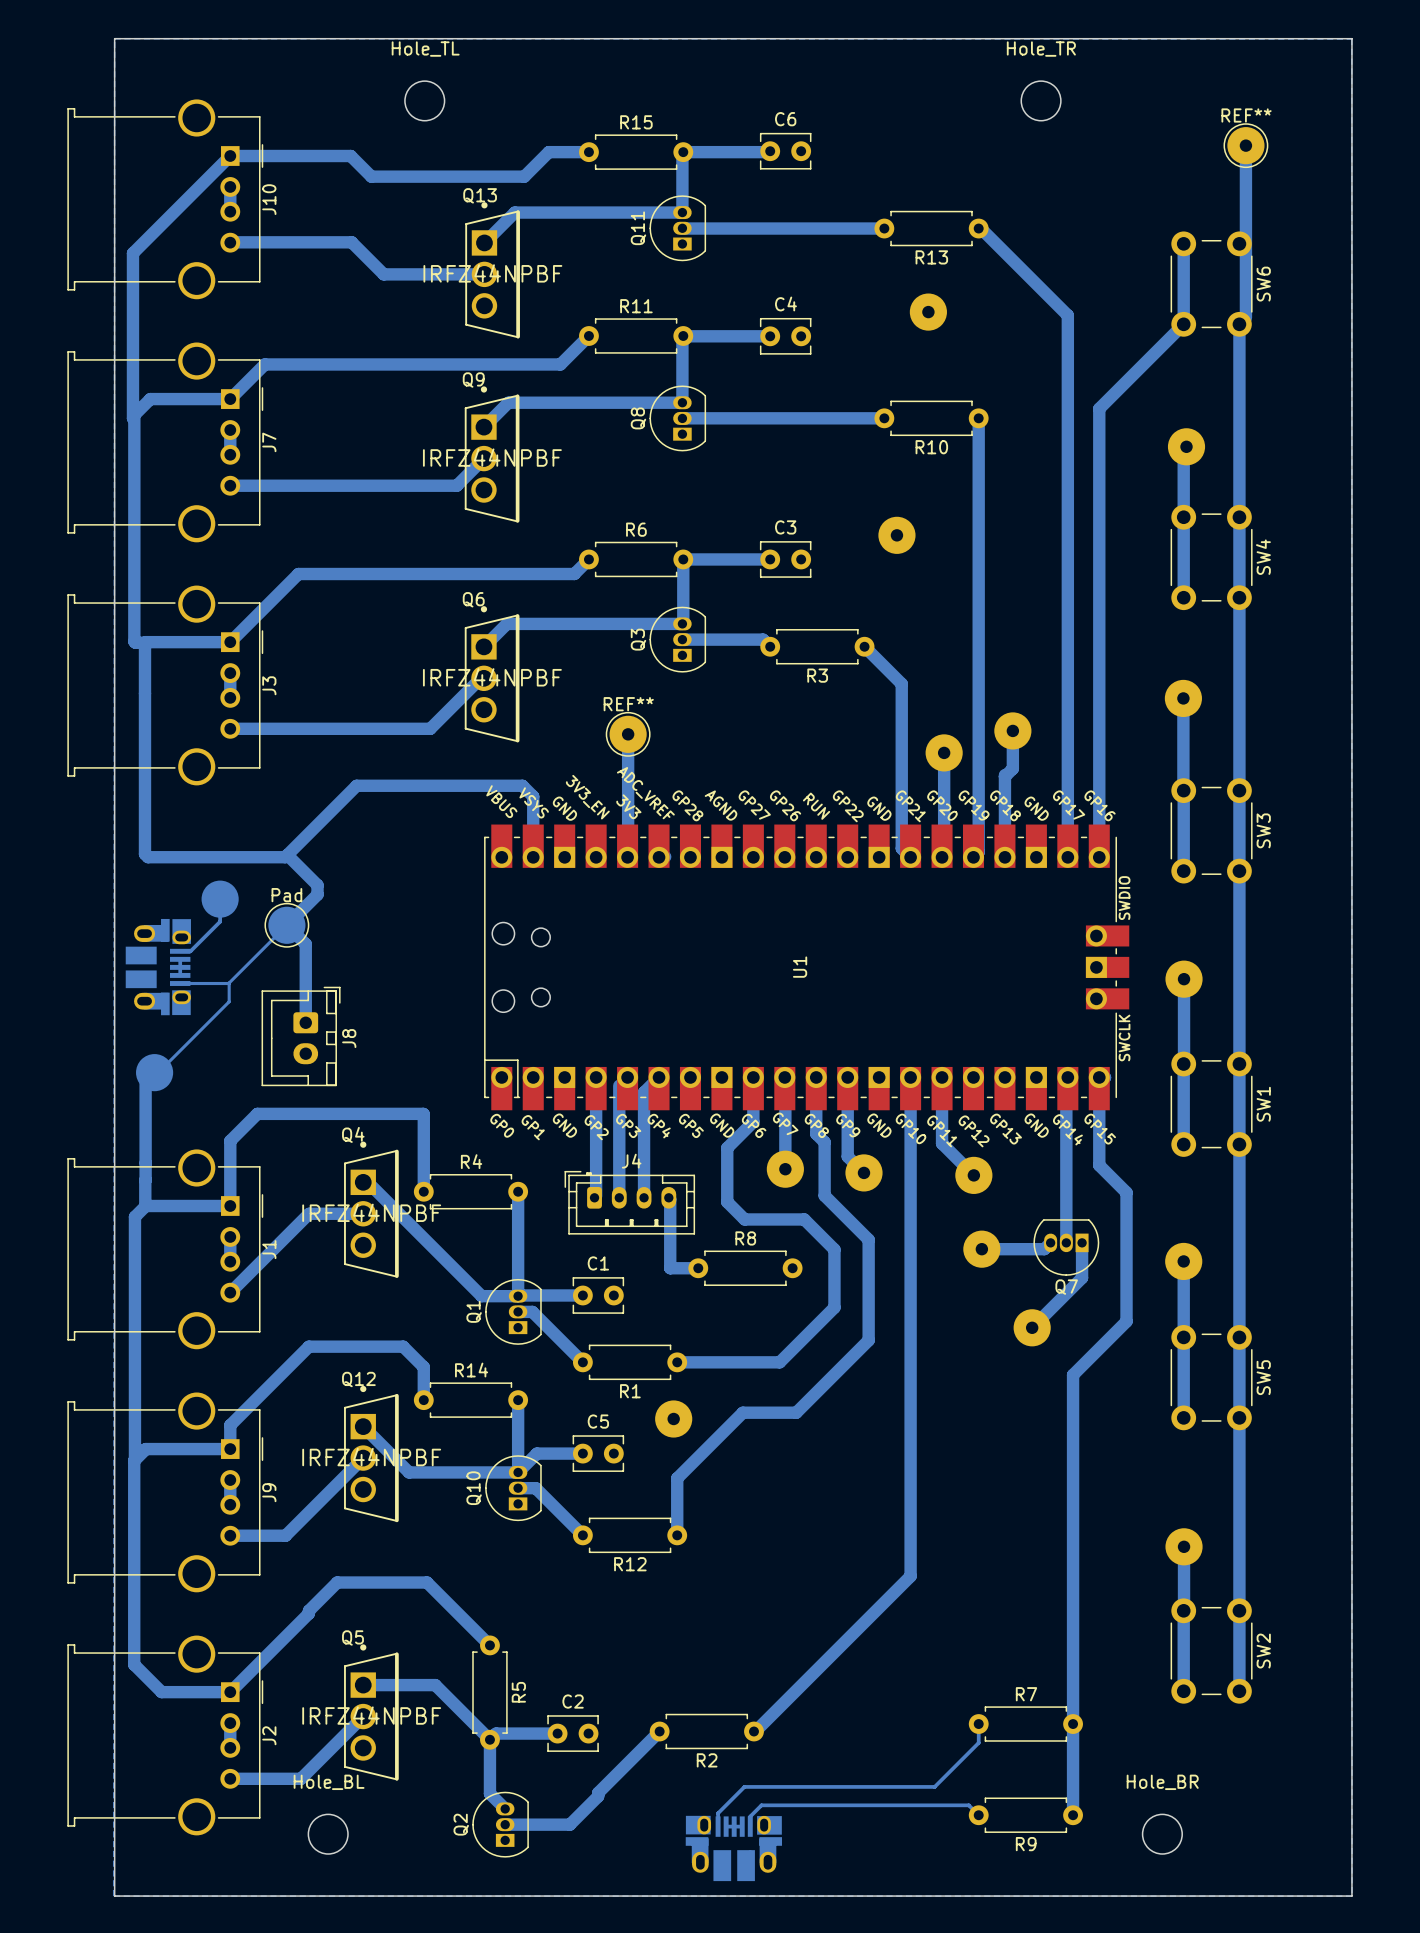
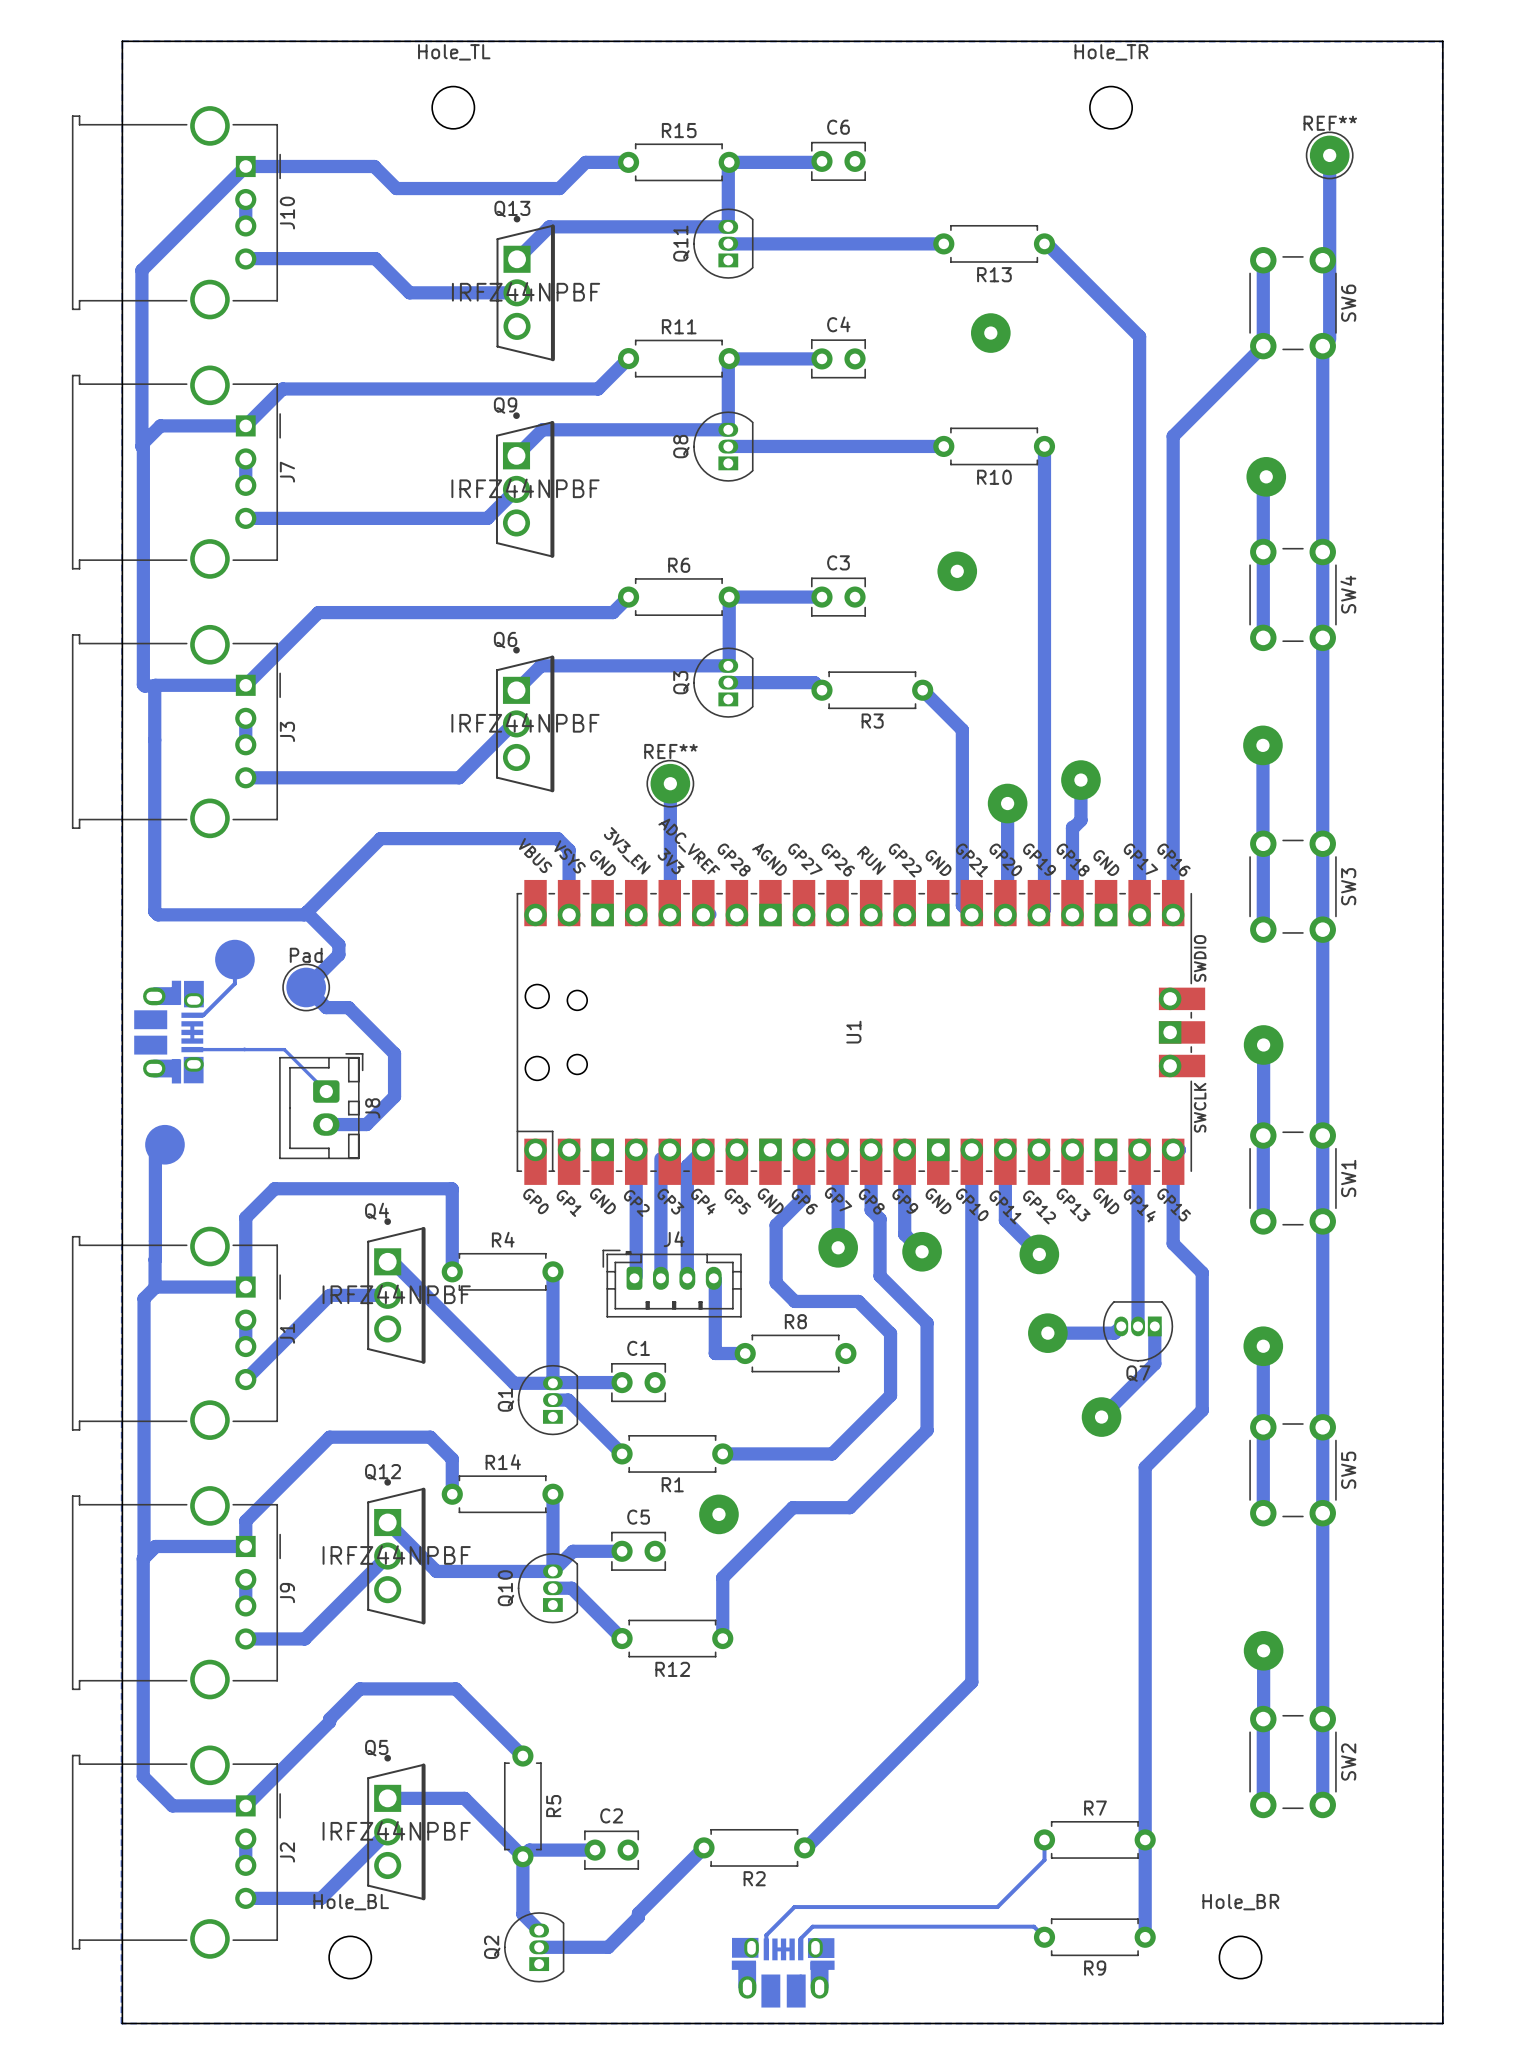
bottom track: (286, 925) (229, 983) -> none
bottom track: (305, 944) (305, 1022) -> (326, 1007) (348, 1007) (394, 1053) (394, 1096) (366, 1124) (326, 1124)
bottom track: (229, 983) (229, 1001) (151, 1079) -> (244, 1049) (284, 1049) (326, 1091)

